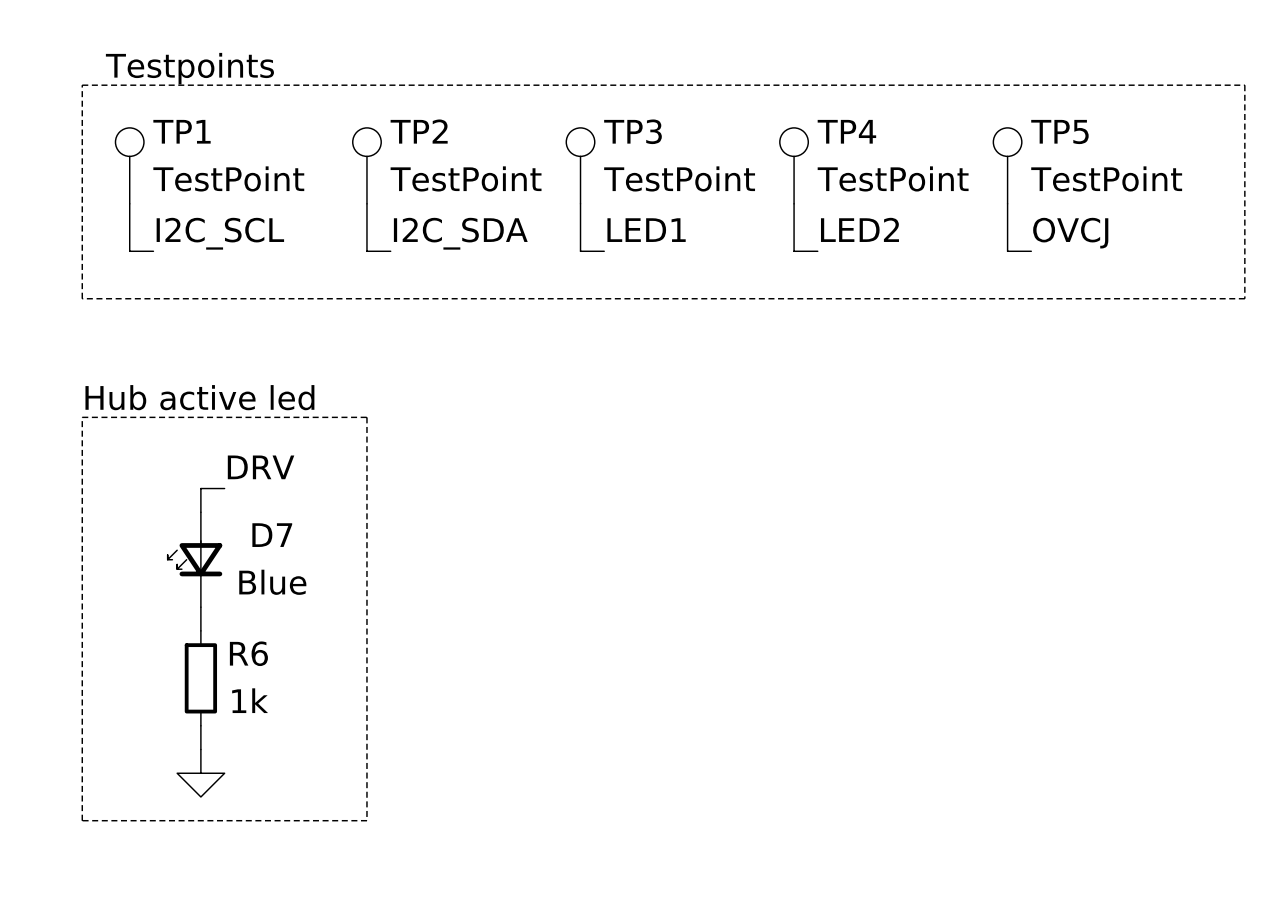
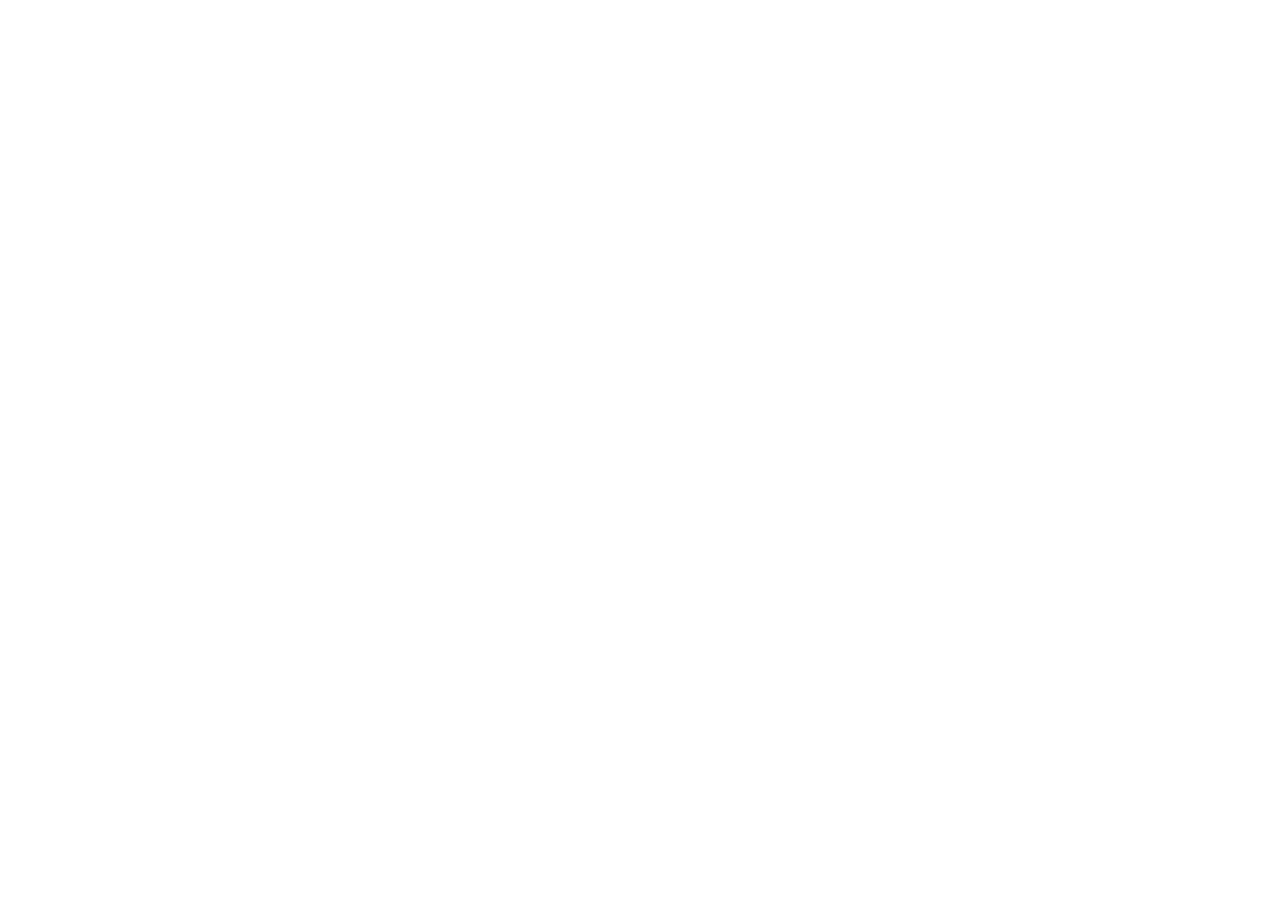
text: Testpoints (189, 68) -> none
line: (82, 85) (82, 298) (1244, 298) (1244, 85) (82, 85) -> none
TP1: TestPoint (129, 165) -> none
TP2: TestPoint (366, 165) -> none
TP3: TestPoint (580, 165) -> none
TP4: TestPoint (794, 165) -> none
TP5: TestPoint (1007, 165) -> none
wire: (129, 203) (129, 251) (153, 251) -> none
wire: (366, 203) (366, 251) (390, 251) -> none
wire: (580, 203) (580, 251) (604, 251) -> none
wire: (794, 203) (794, 251) (817, 251) -> none
wire: (1007, 203) (1007, 251) (1031, 251) -> none
label: LED2 (859, 229) -> none
label: LED1 (646, 230) -> none
label: I2C_SCL (220, 233) -> none
label: I2C_SDA (460, 233) -> none
label: OVCJ (1070, 233) -> none
text: Hub active led (199, 397) -> none
line: (82, 417) (366, 417) (366, 820) (82, 820) (82, 417) -> none
label: DRV (261, 467) -> none
wire: (224, 488) (200, 488) (200, 512) -> none
D7: Blue (194, 559) -> none
wire: (200, 607) (200, 630) -> none
R6: 1k (200, 678) -> none
wire: (200, 725) (200, 749) -> none
power symbol: (200, 773) -> none

